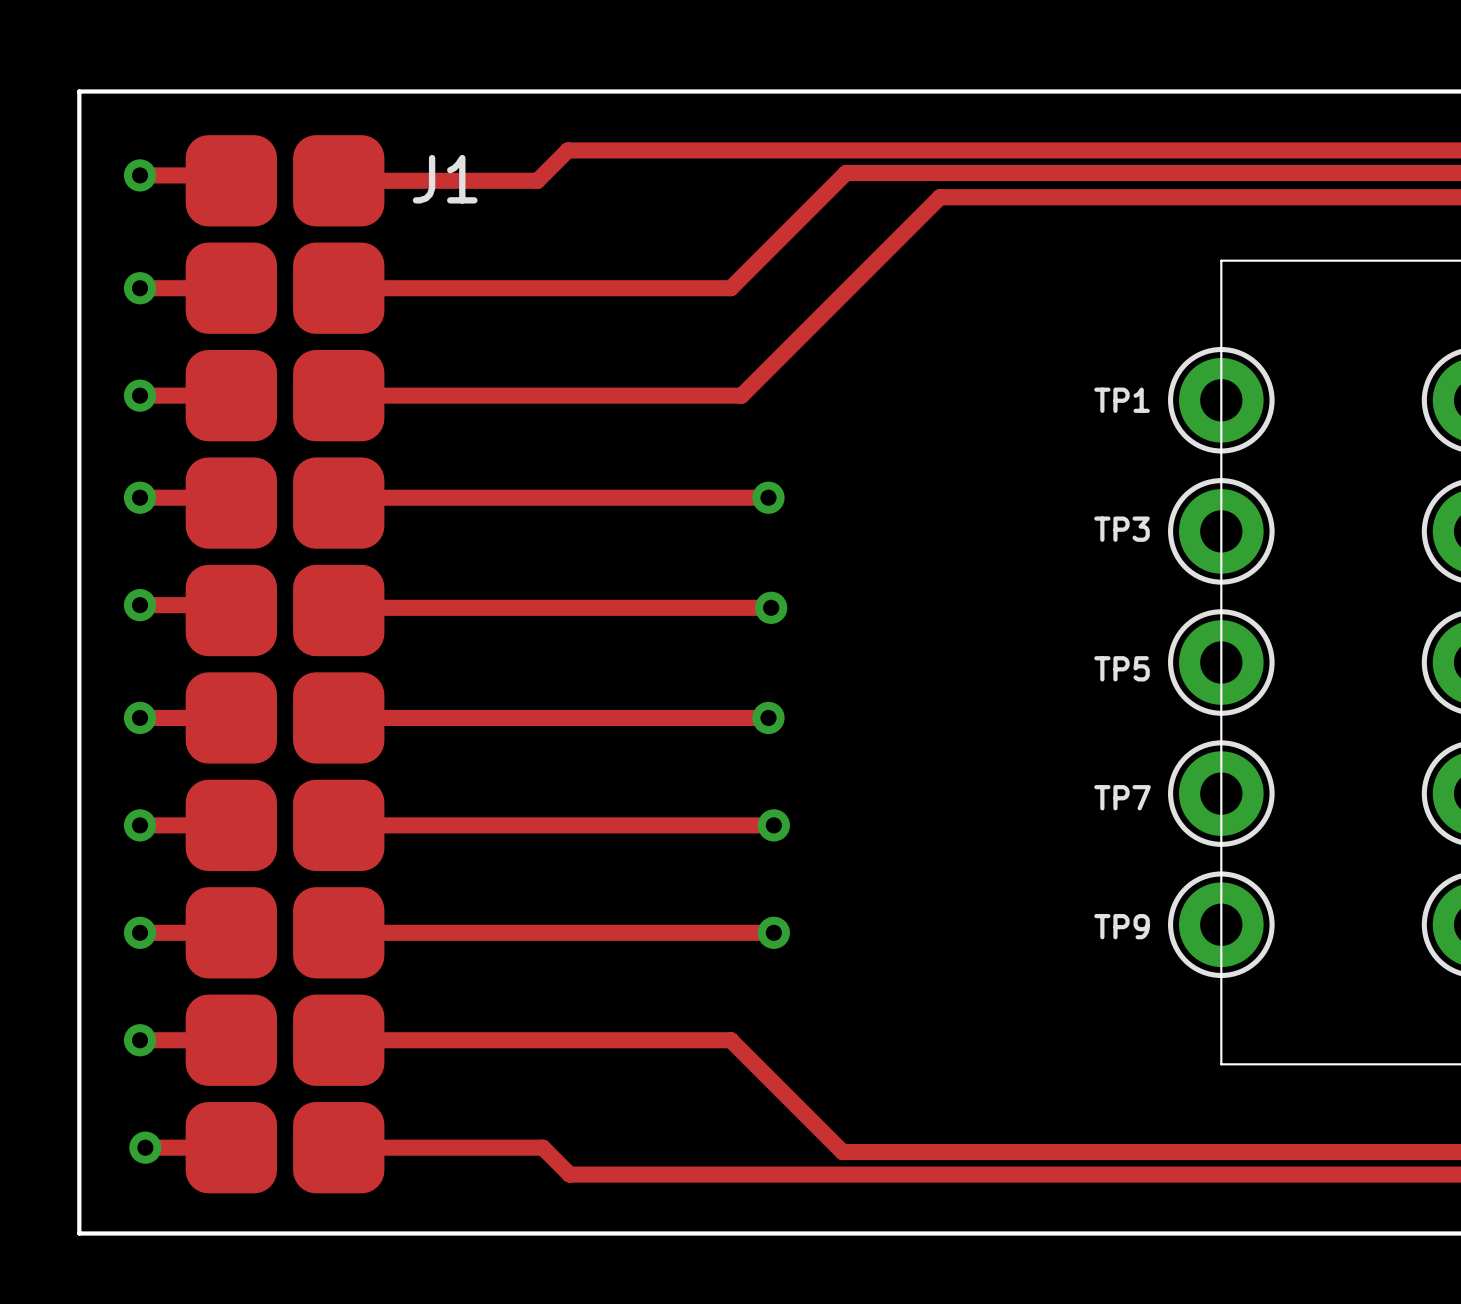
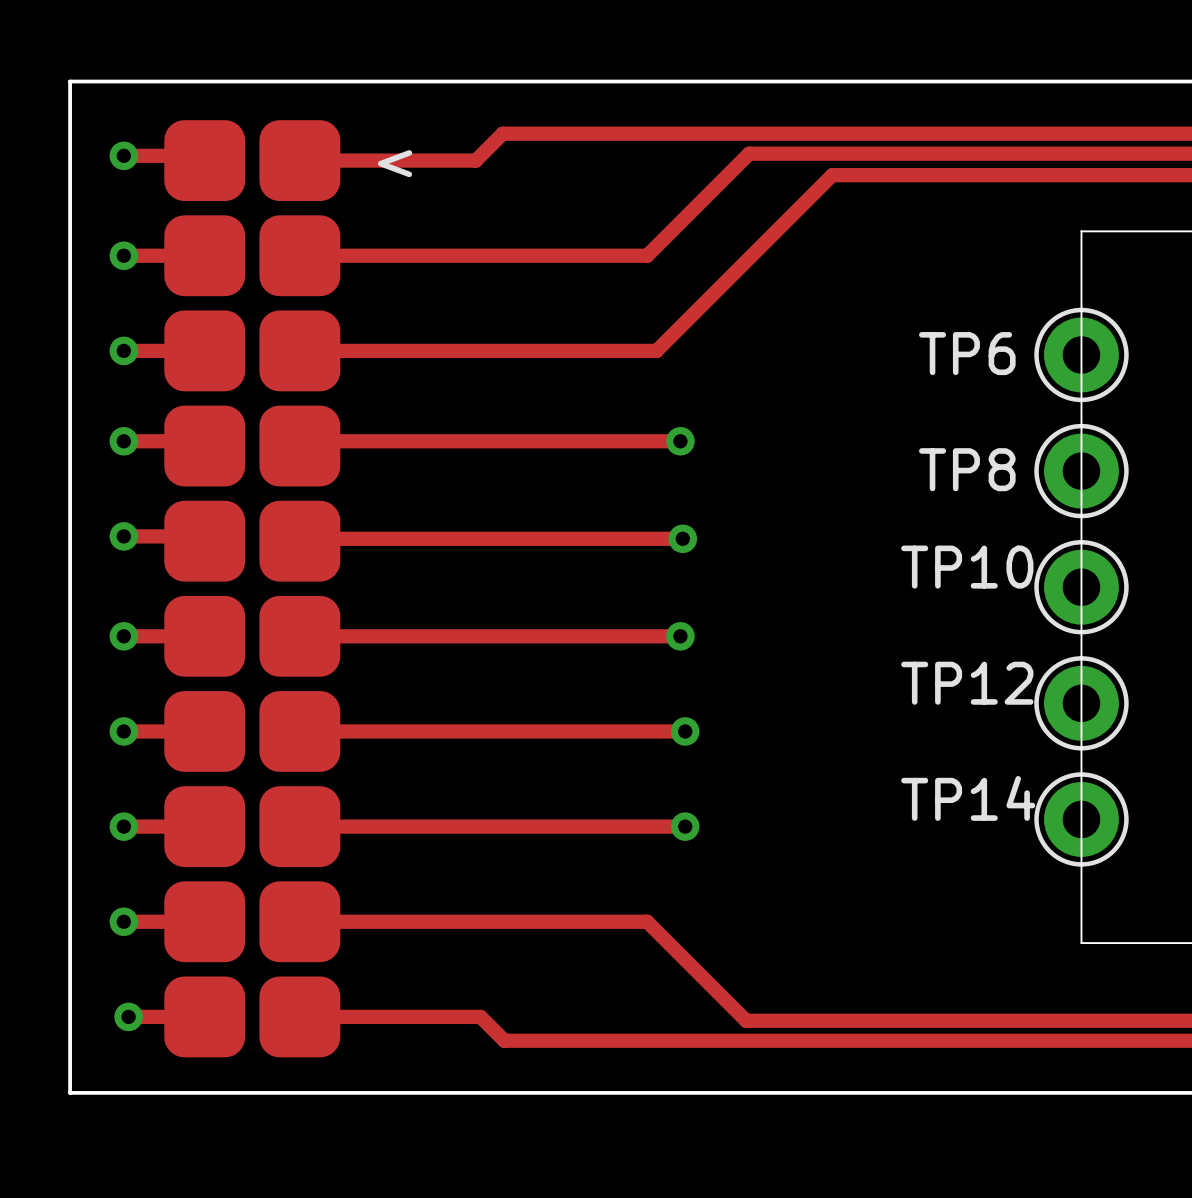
J1 name: J1 (445, 179) -> < (395, 163)
TP1 name: TP1 (1122, 400) -> TP6 (967, 353)
TP3 name: TP3 (1122, 529) -> TP8 (967, 469)
TP5 name: TP5 (1122, 668) -> TP10 (967, 567)
TP7 name: TP7 (1122, 797) -> TP12 (967, 683)
TP9 name: TP9 (1122, 926) -> TP14 (968, 798)

